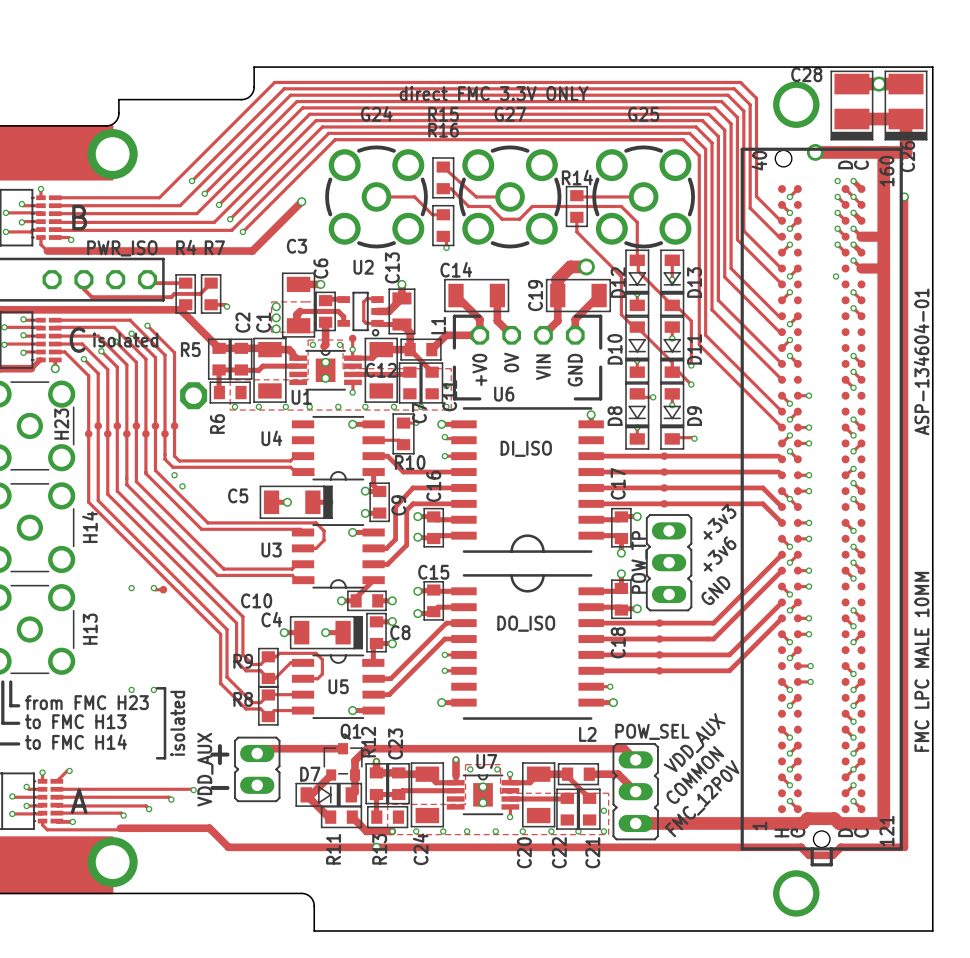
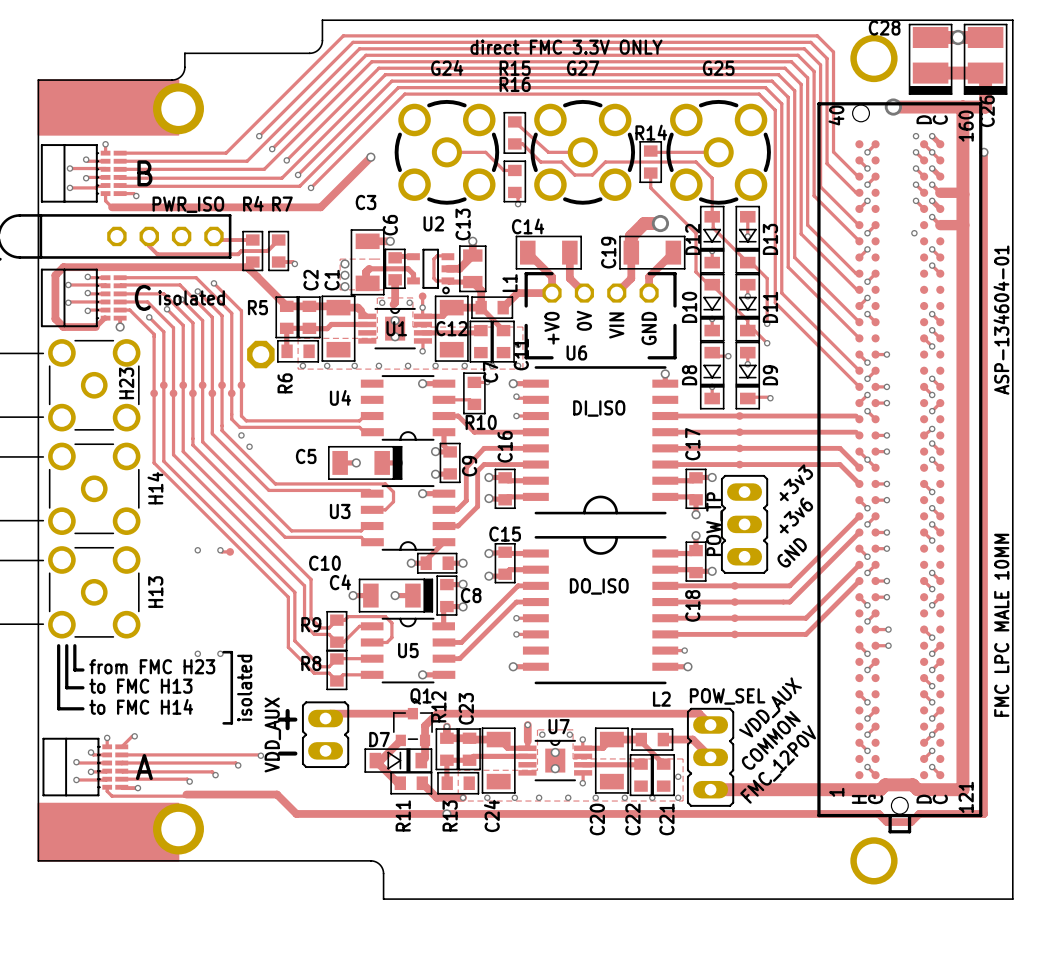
U1 name position: U1 (301, 397) -> U1 (396, 328)

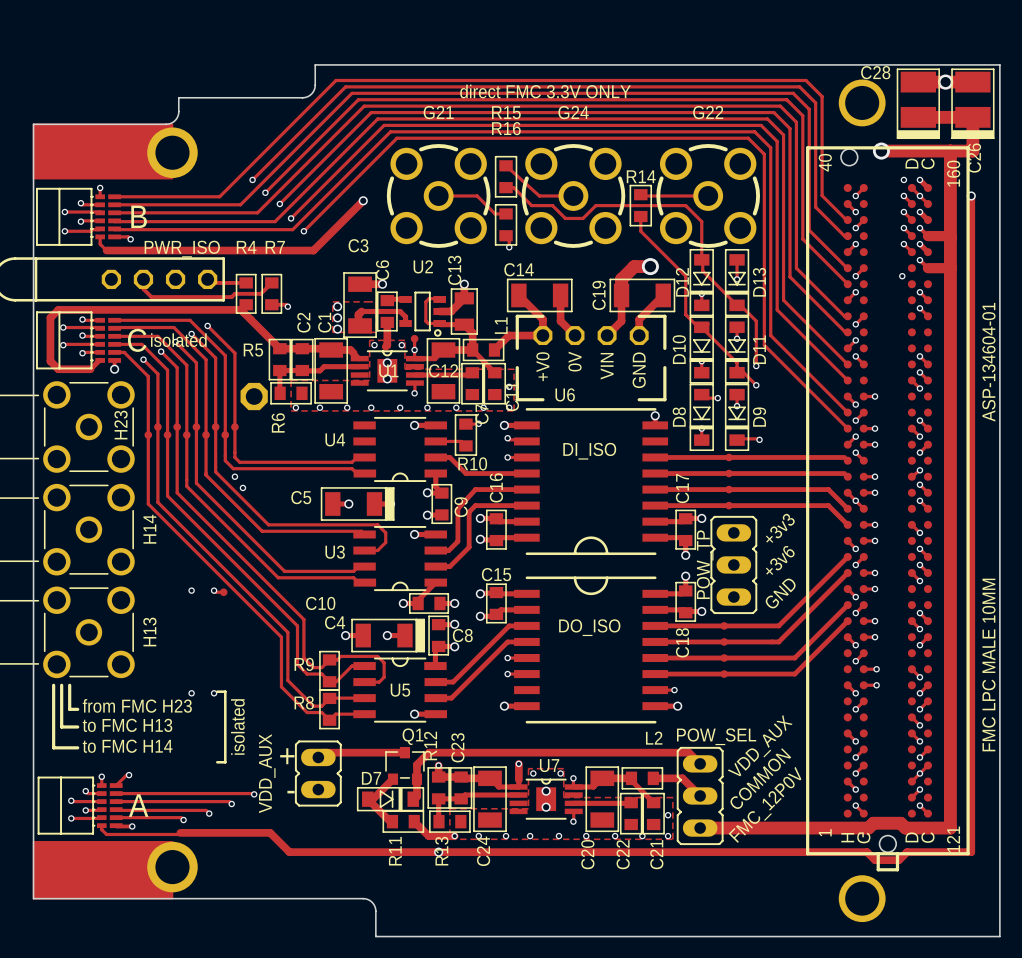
G24 name: G24 (447, 67) -> G21 (438, 112)
G27 name: G27 (583, 68) -> G24 (573, 112)
G25 name: G25 (718, 68) -> G22 (708, 112)

